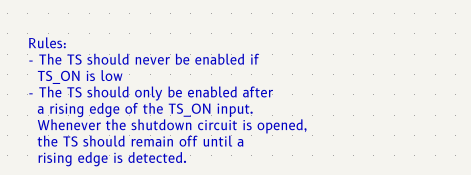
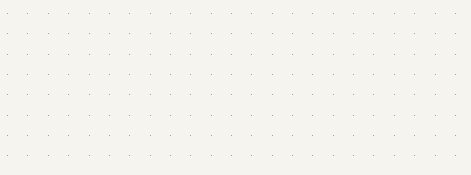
text: Rules: (47, 42) -> none
text: - The TS should never be enabled if (144, 59) -> none
text: TS_ON is low (80, 77) -> none
text: - The TS should only be enabled after (151, 93) -> none
text: a rising edge of the TS_ON input. (145, 110) -> none
text: Whenever the shutdown circuit is opened, (172, 126) -> none
text: the TS should remain off until a (140, 141) -> none
text: rising edge is detected. (112, 159) -> none

